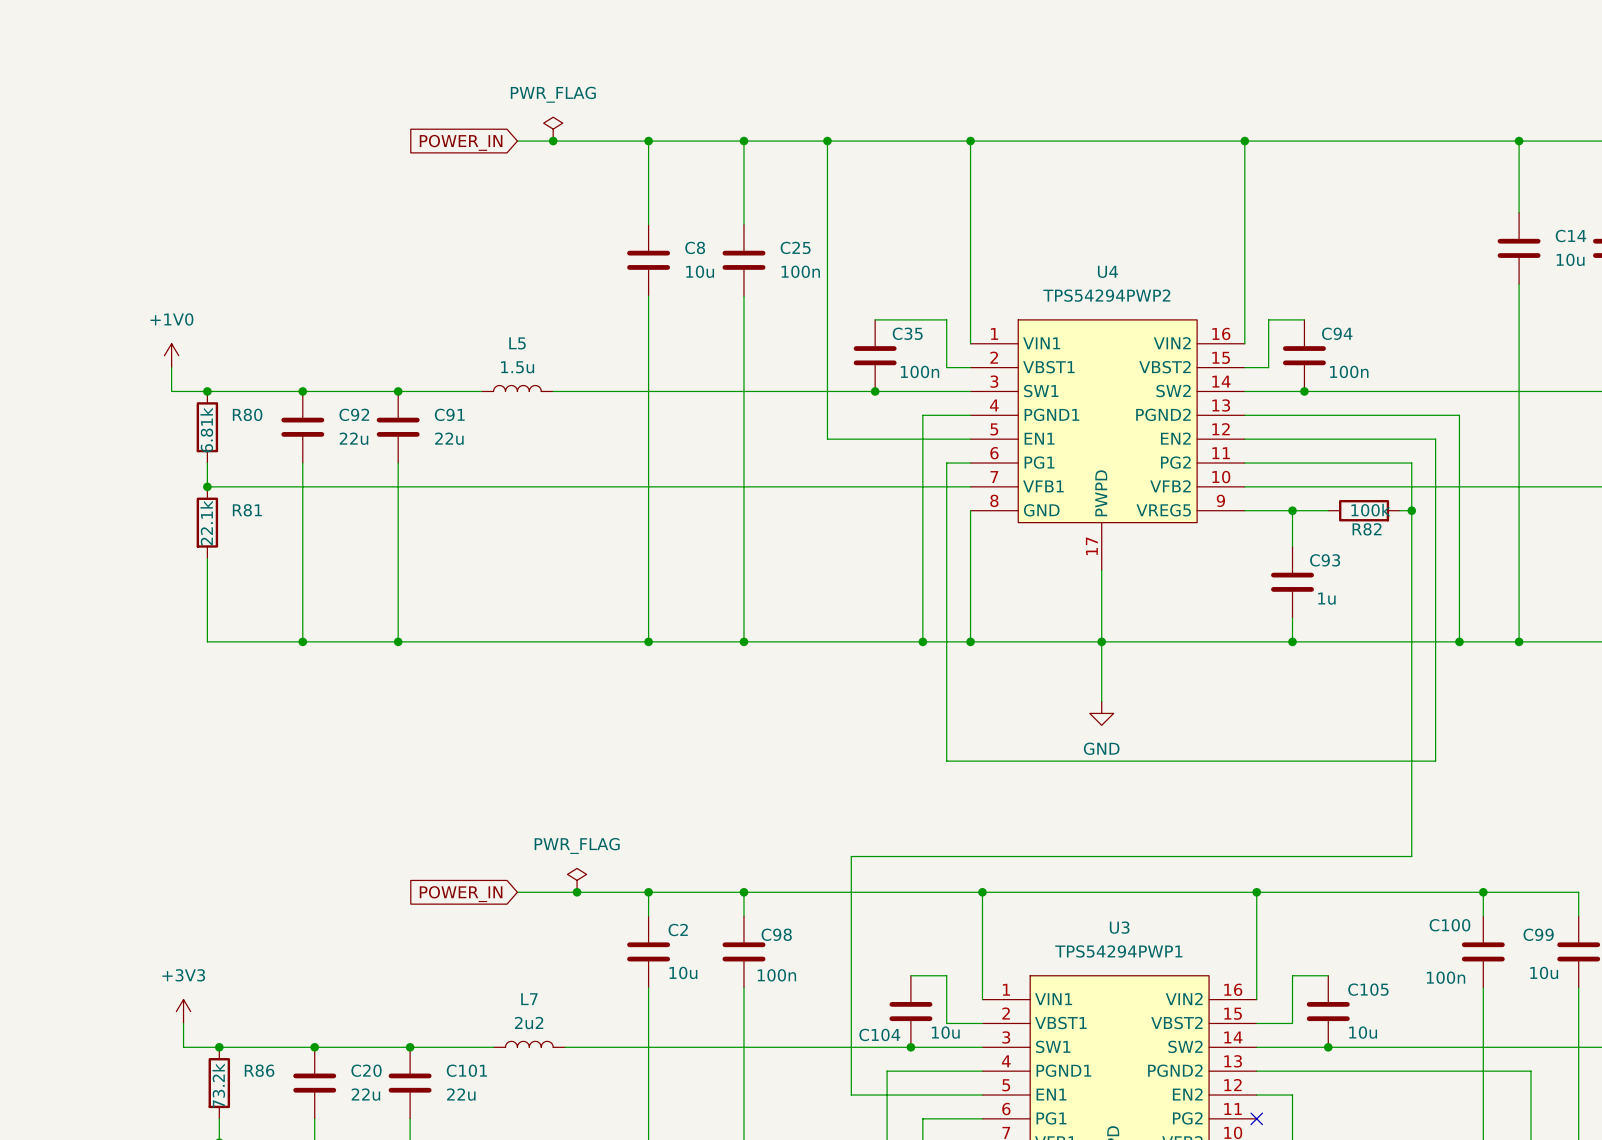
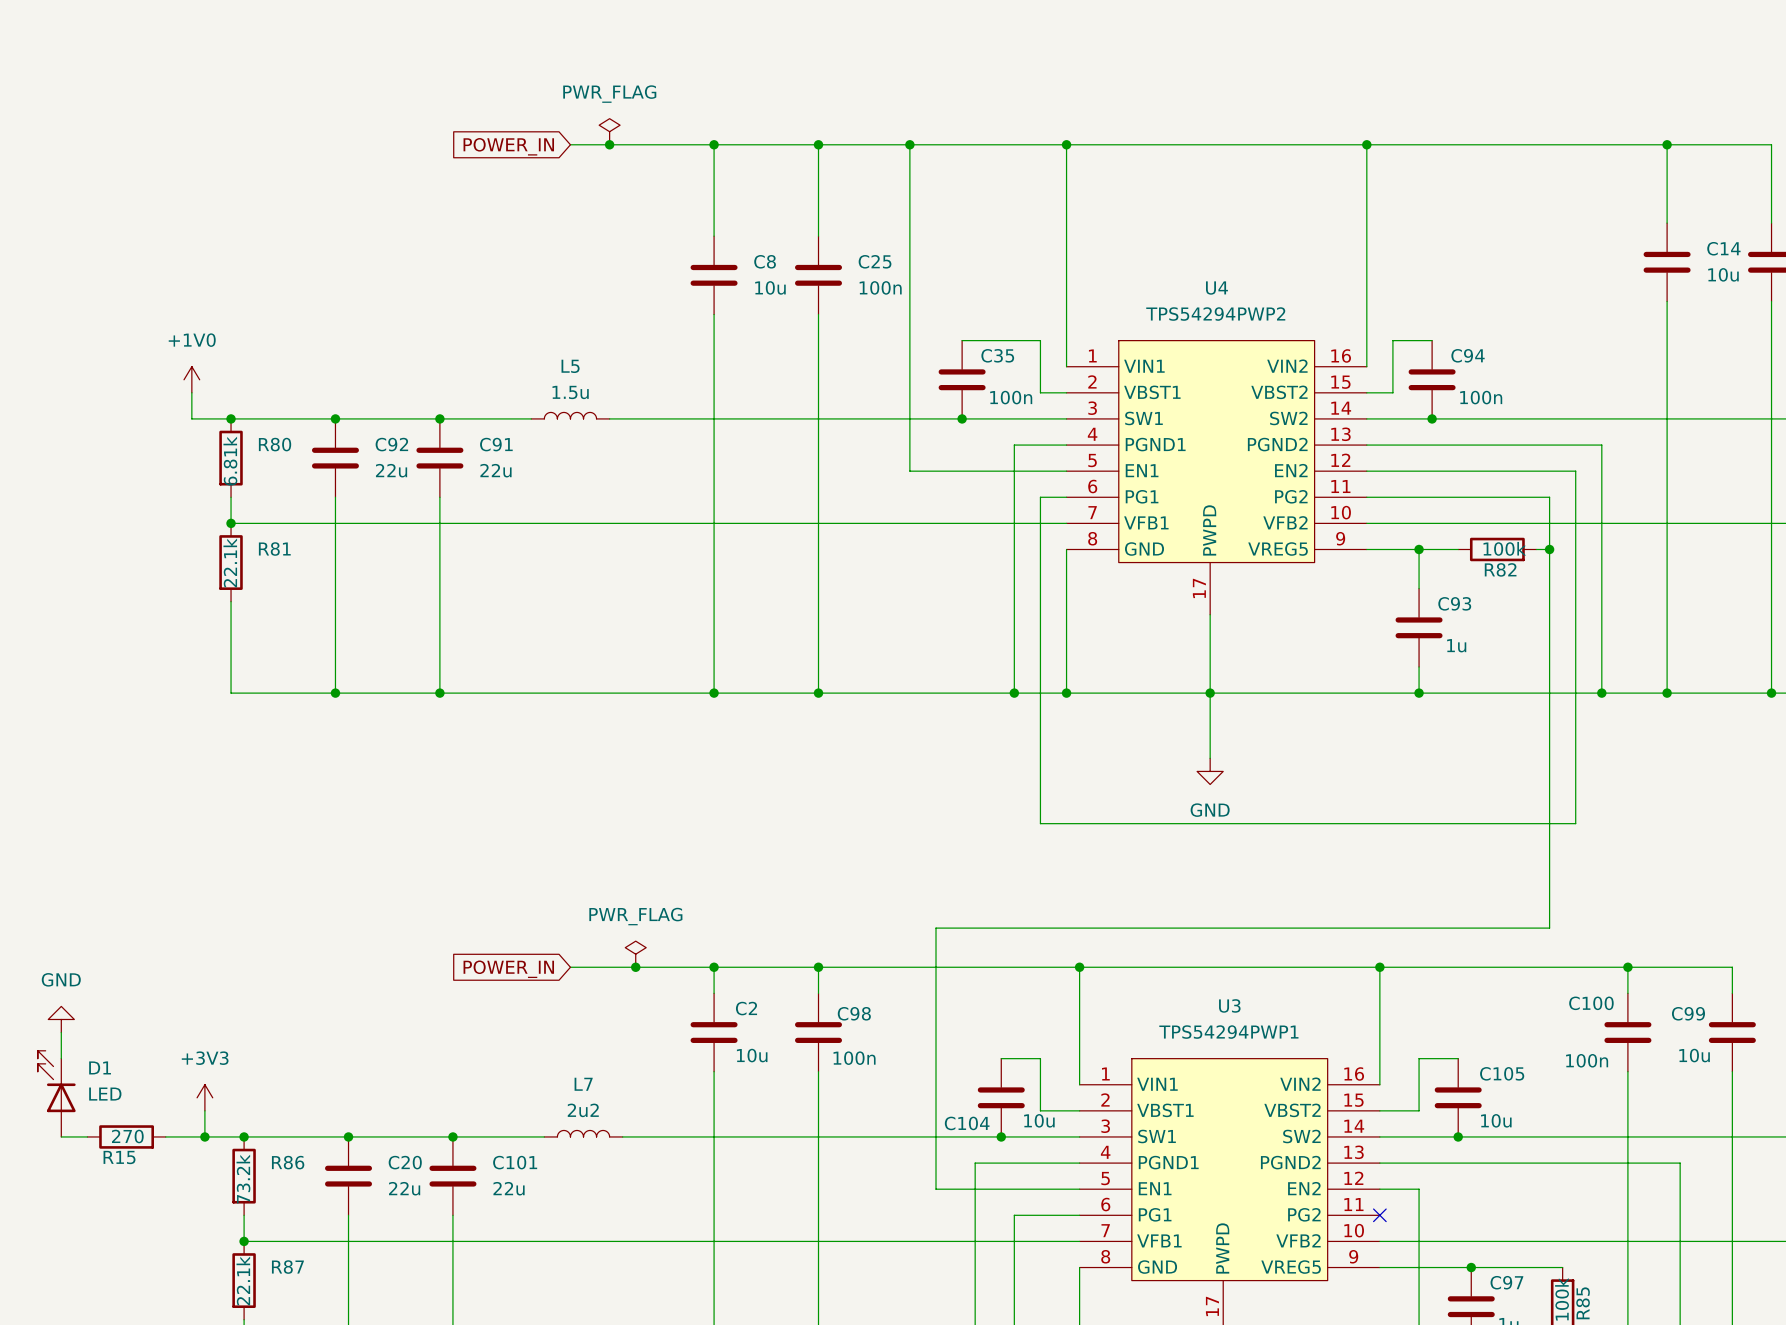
power symbol: none -> GND (61, 1019)
wire: none -> (61, 1032) (61, 1058)
D1: none -> LED (56, 1093)
wire: none -> (61, 1136) (87, 1136)
R15: none -> 270 (126, 1136)
wire: none -> (165, 1136) (204, 1136)
junction: none -> (204, 1136)

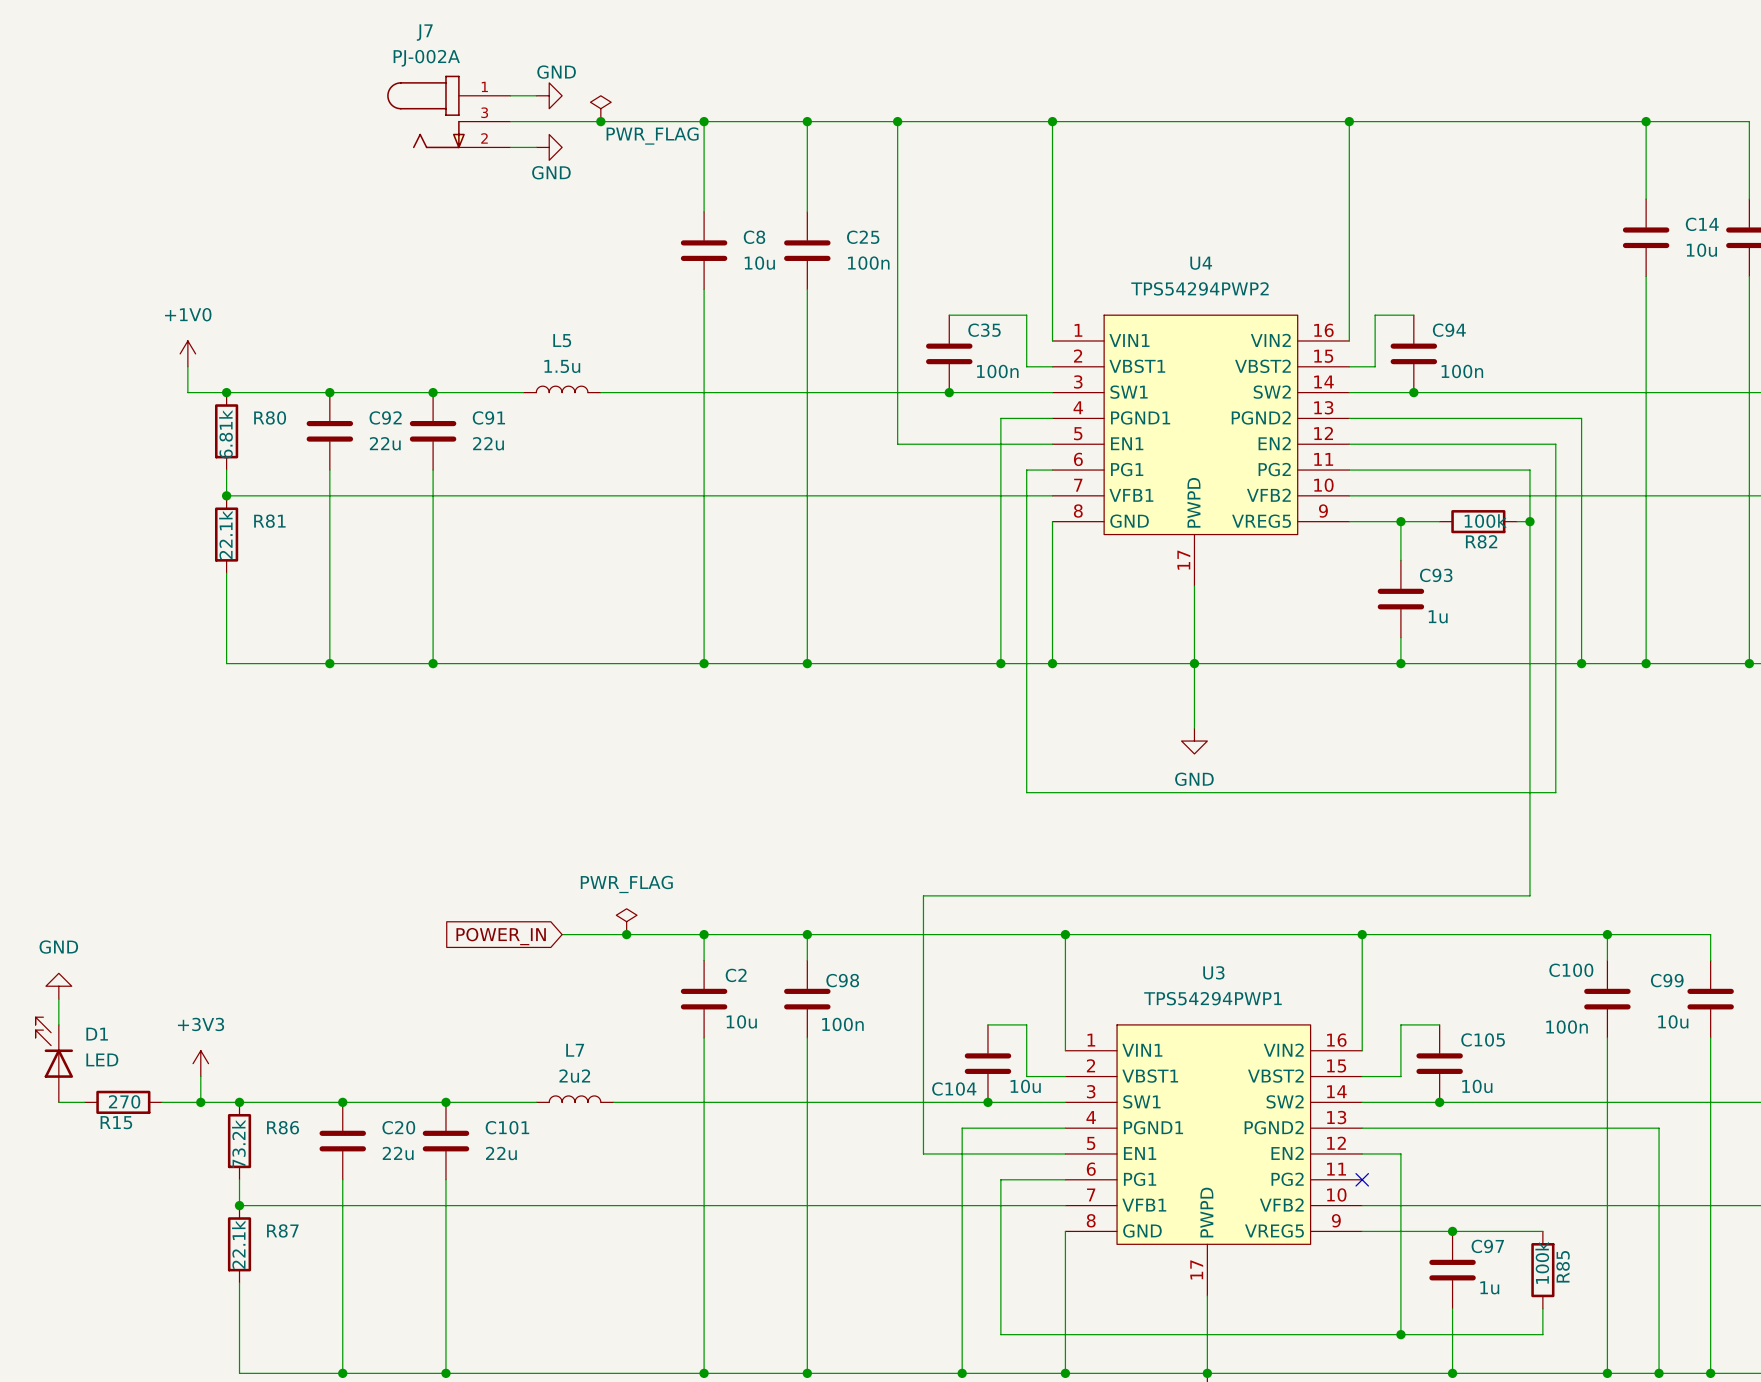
power symbol text position: PWR_FLAG (609, 94) -> PWR_FLAG (652, 136)
wire: none -> (510, 95) (536, 95)
power symbol: none -> GND (549, 95)
J7: none -> PJ-002A (448, 111)
wire: none -> (510, 121) (562, 121)
global label: POWER_IN (508, 146) -> none
wire: none -> (510, 147) (536, 147)
power symbol: none -> GND (549, 147)

